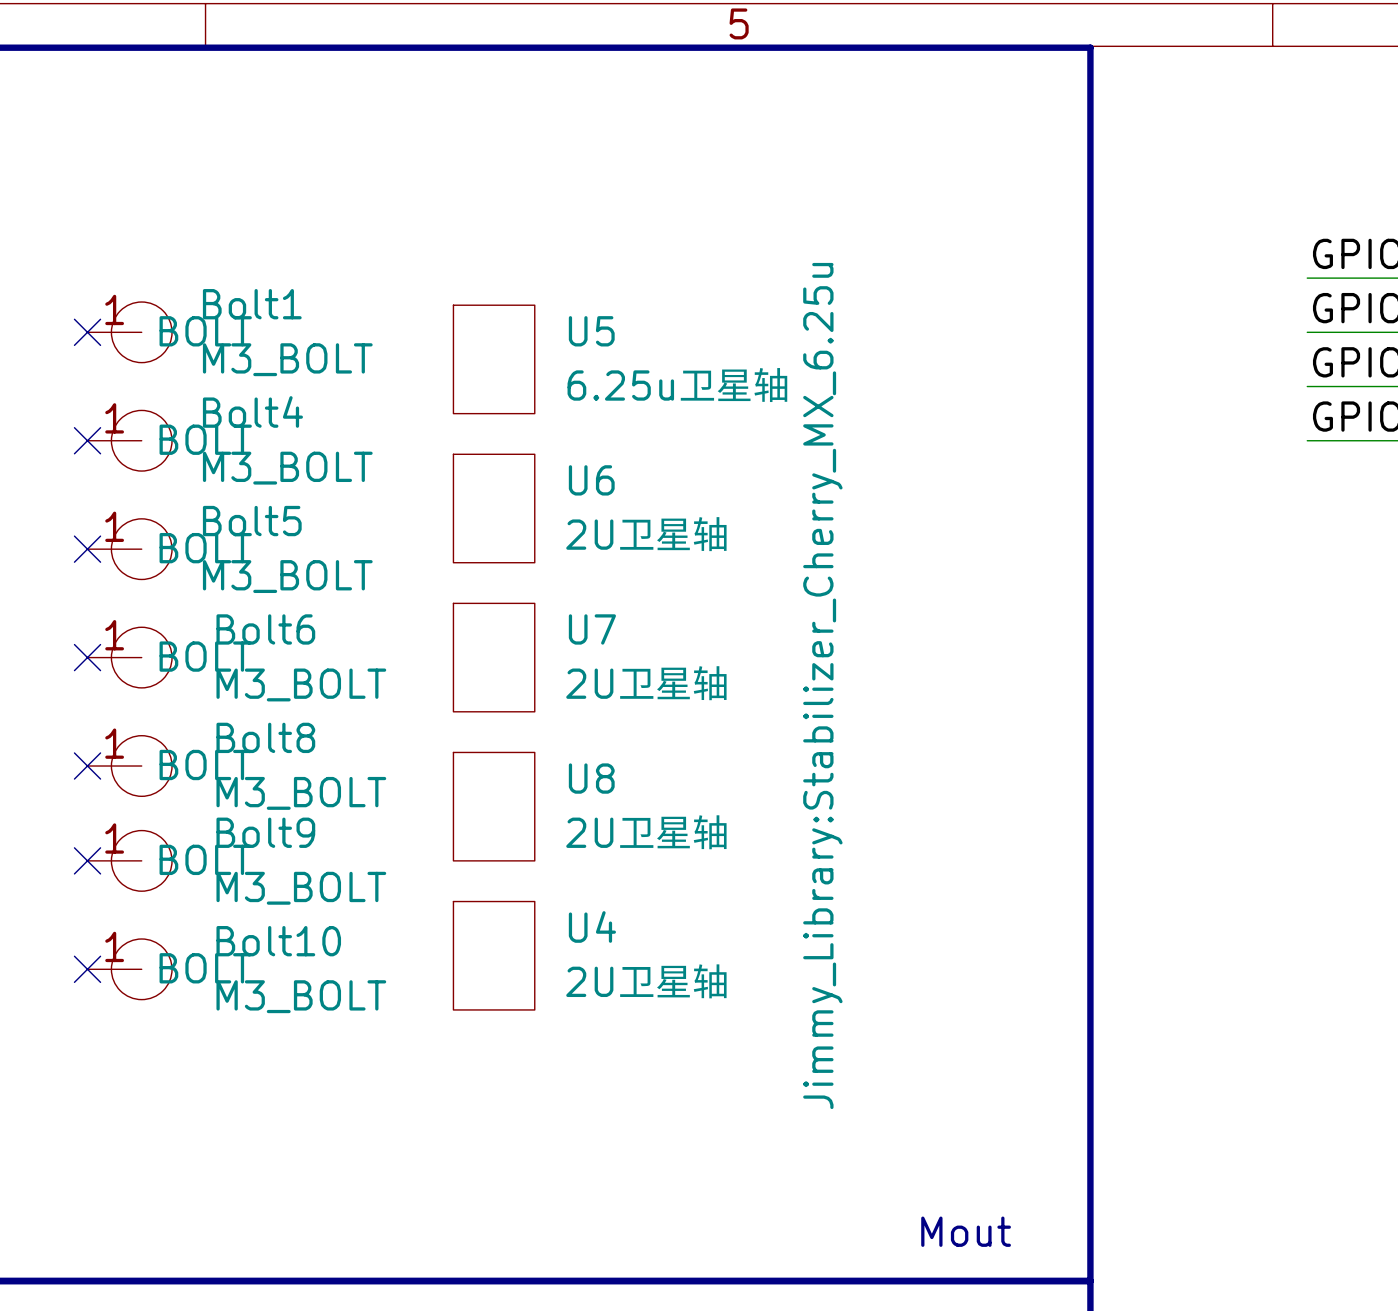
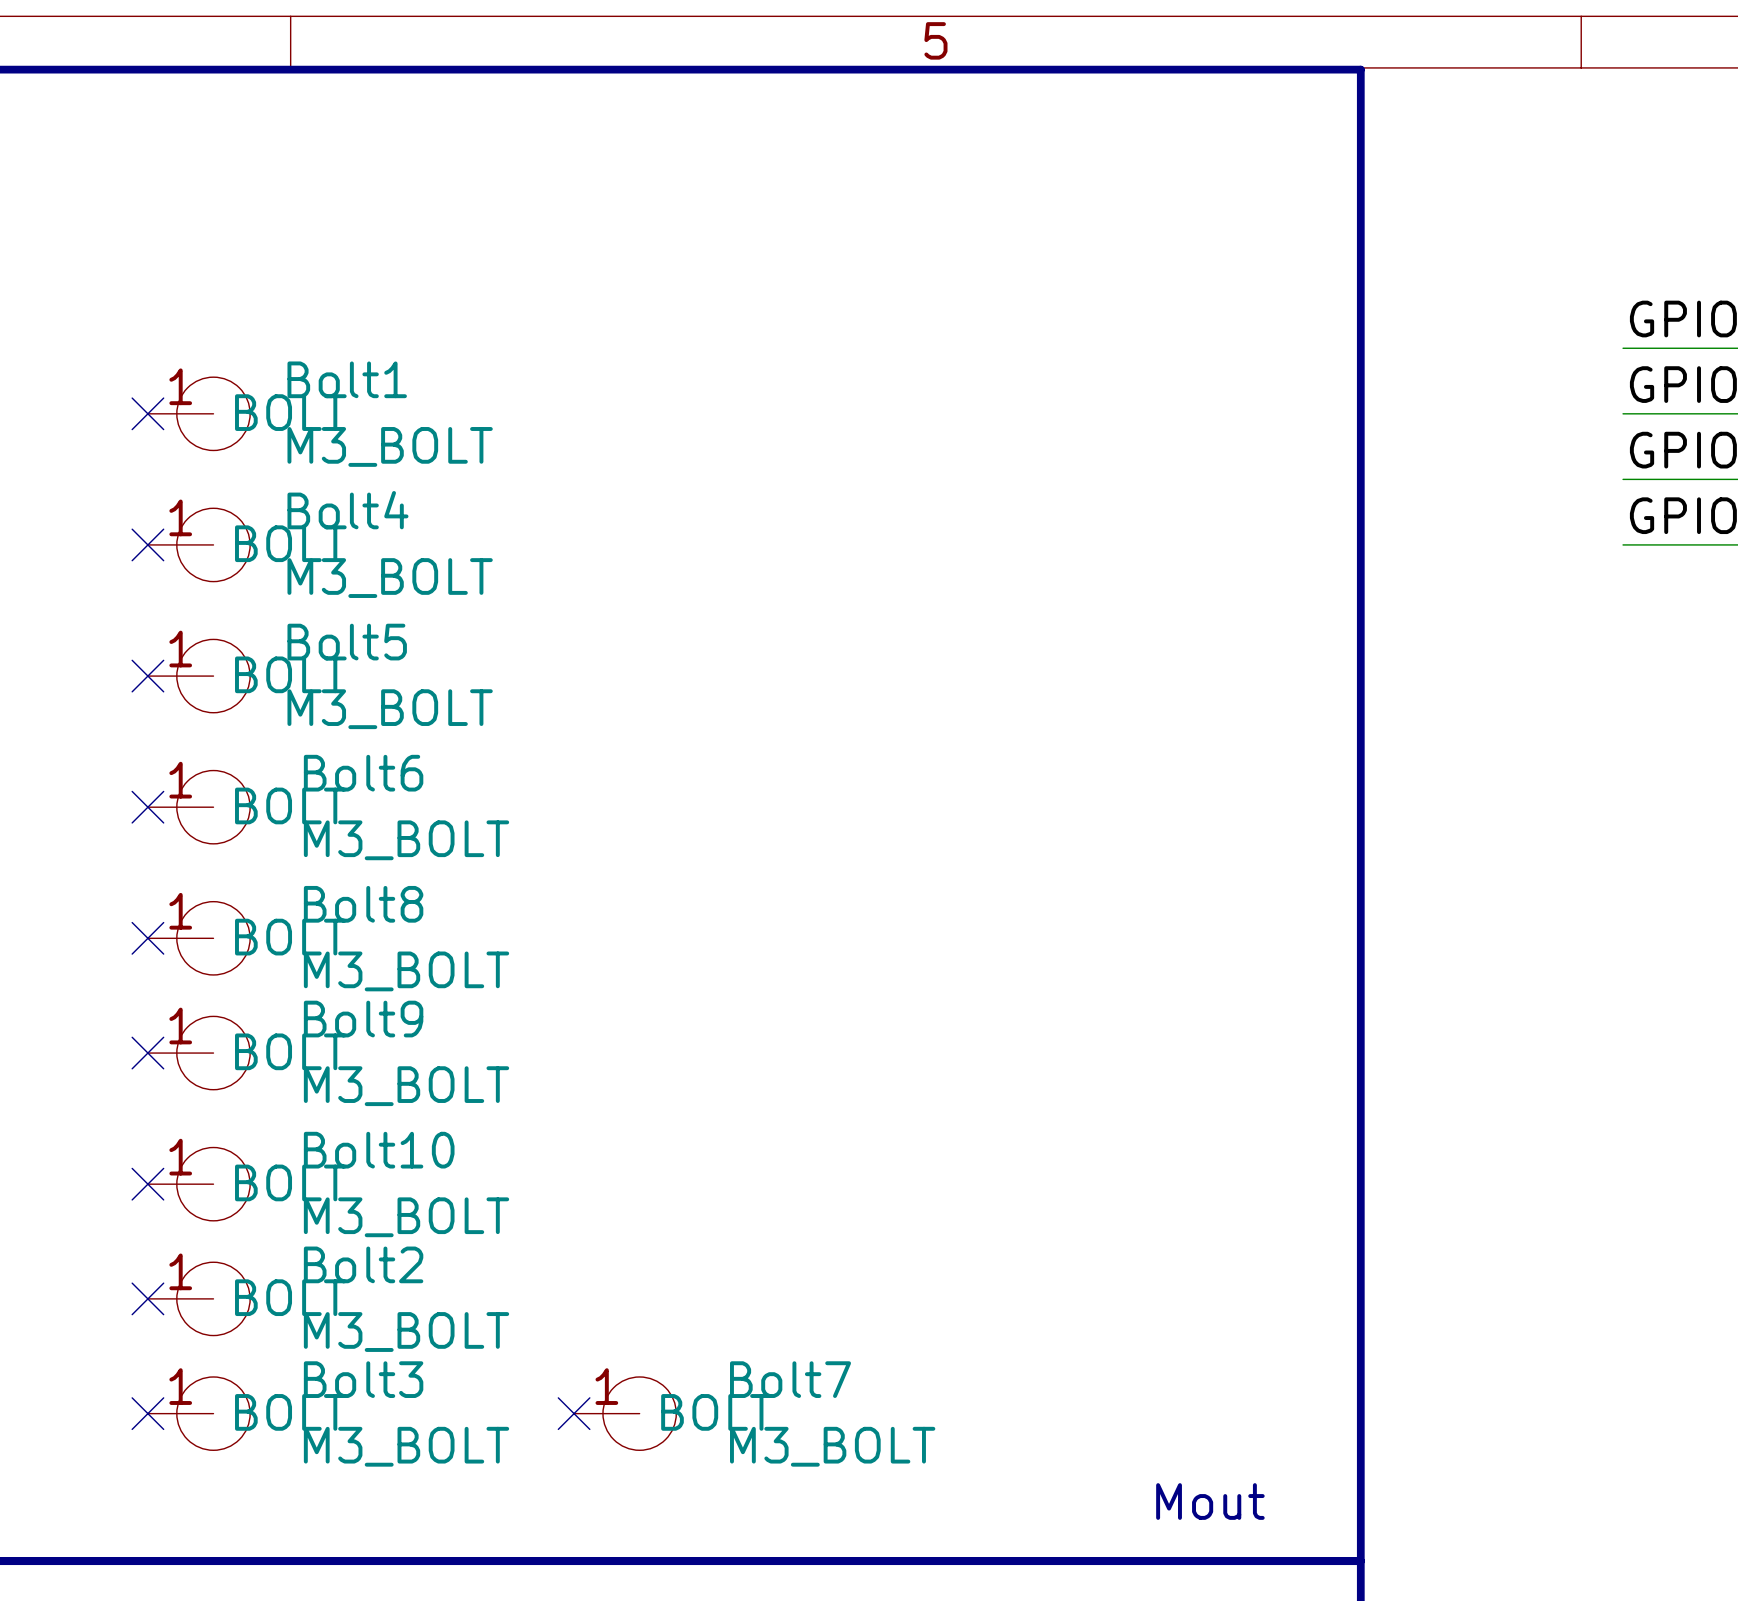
U5: 6.25u卫星轴 (494, 359) -> none
U6: 2U卫星轴 (494, 508) -> none
U7: 2U卫星轴 (494, 657) -> none
U8: 2U卫星轴 (494, 806) -> none
U4: 2U卫星轴 (494, 955) -> none
no-connect mark: none -> (147, 1298)
Bolt2: none -> M3_BOLT (199, 1298)
no-connect mark: none -> (147, 1413)
Bolt3: none -> M3_BOLT (199, 1413)
no-connect mark: none -> (574, 1413)
Bolt7: none -> M3_BOLT (625, 1413)

